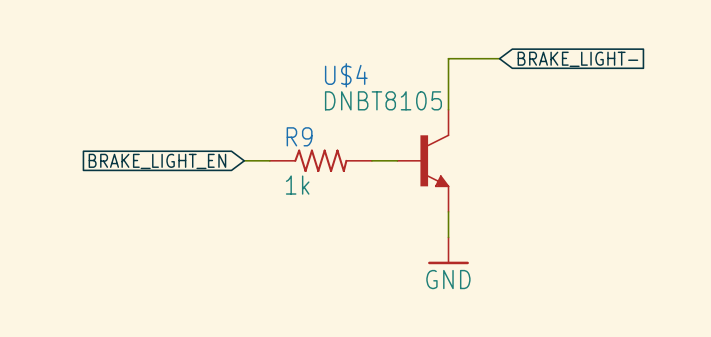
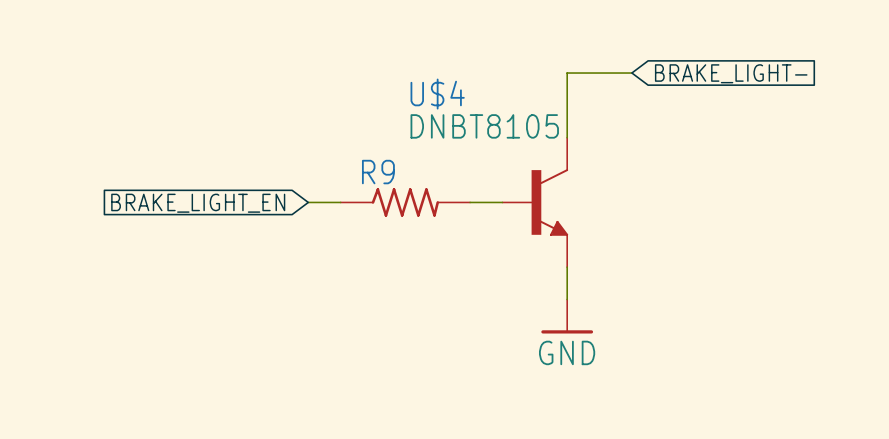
R9 value: 1k (297, 185) -> none

